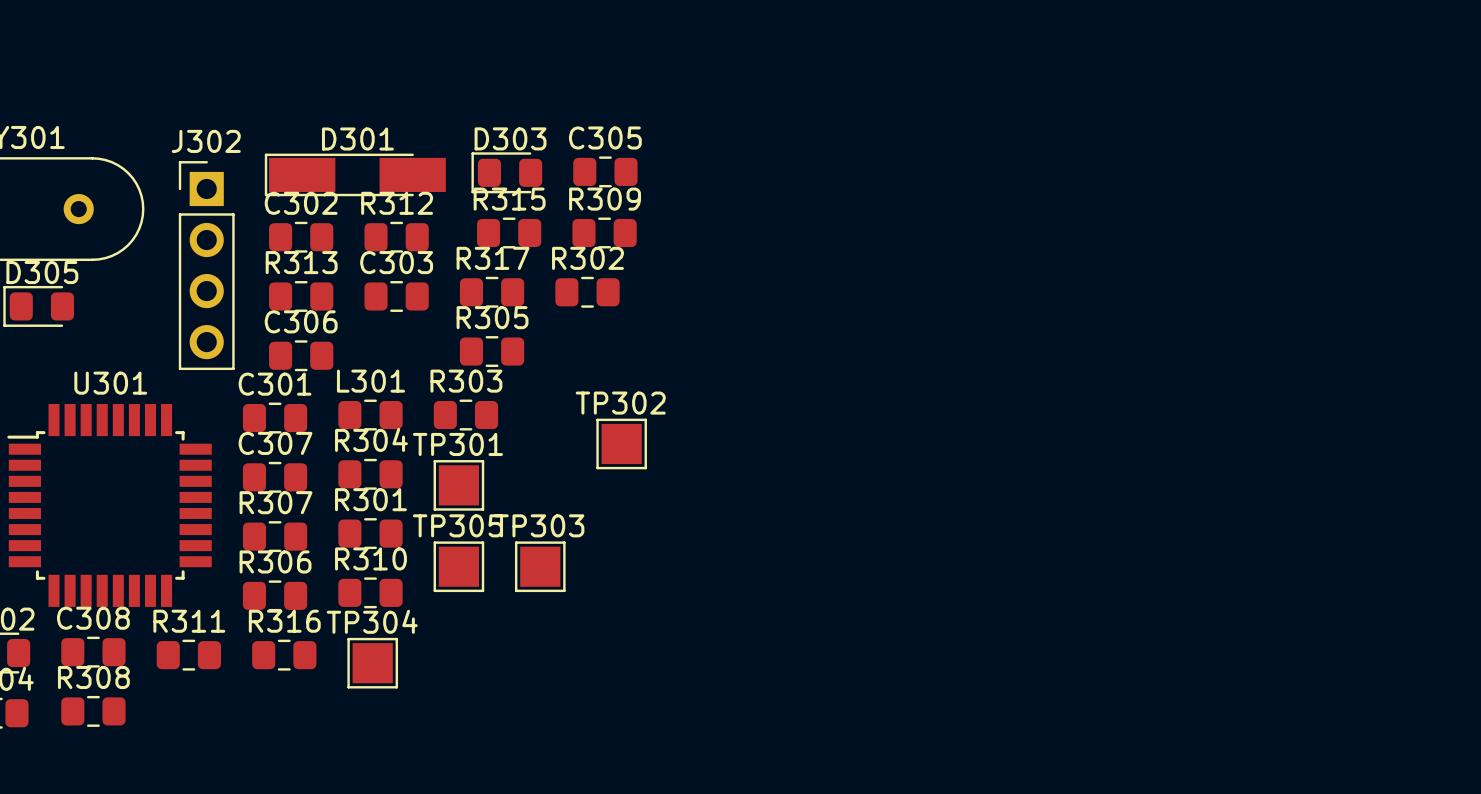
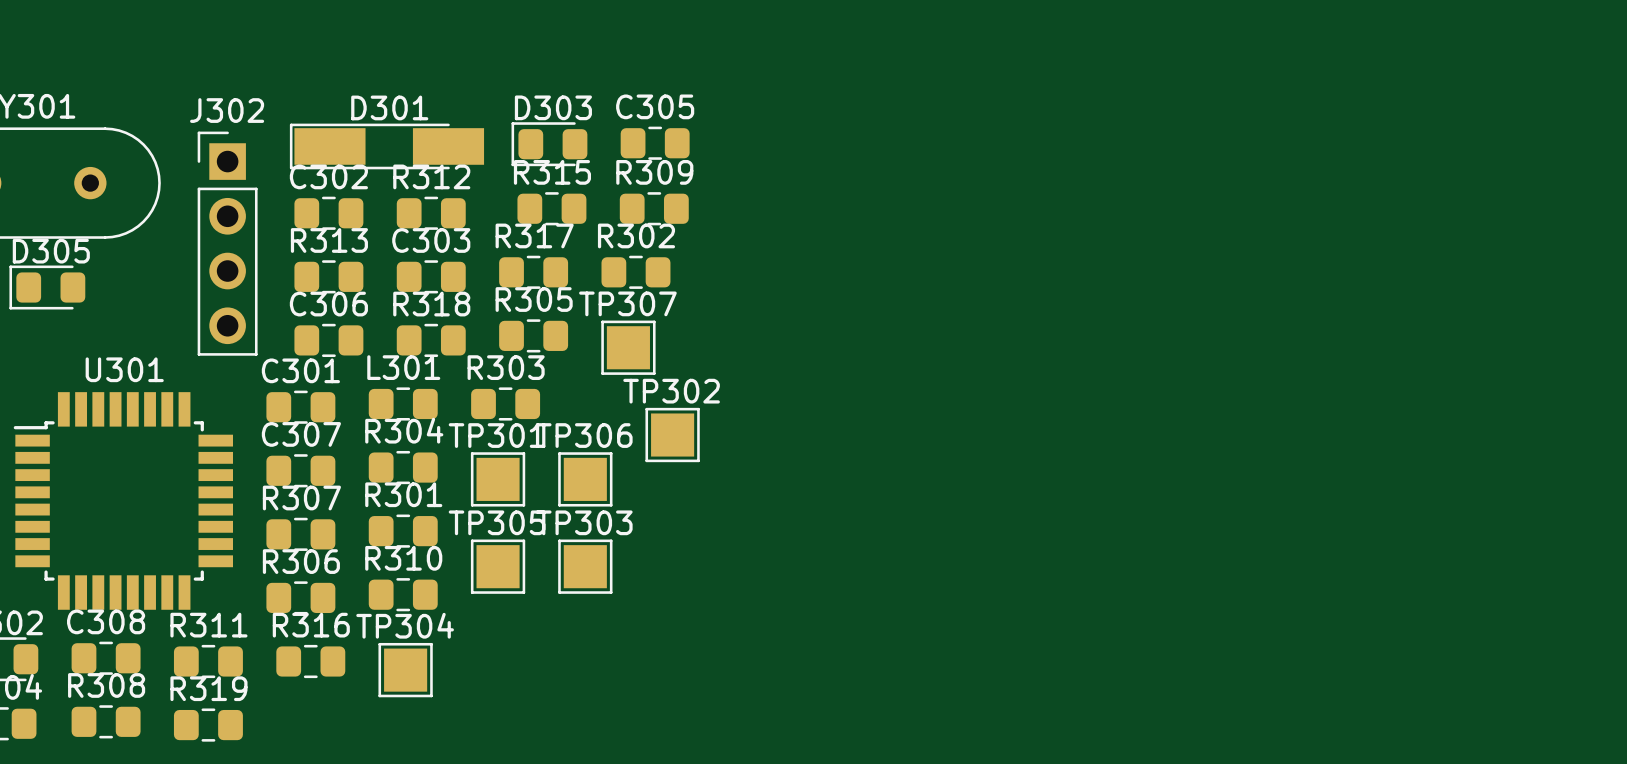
R318: none -> (431, 340)
TP307: none -> (628, 347)
TP306: none -> (585, 479)
R319: none -> (208, 725)

